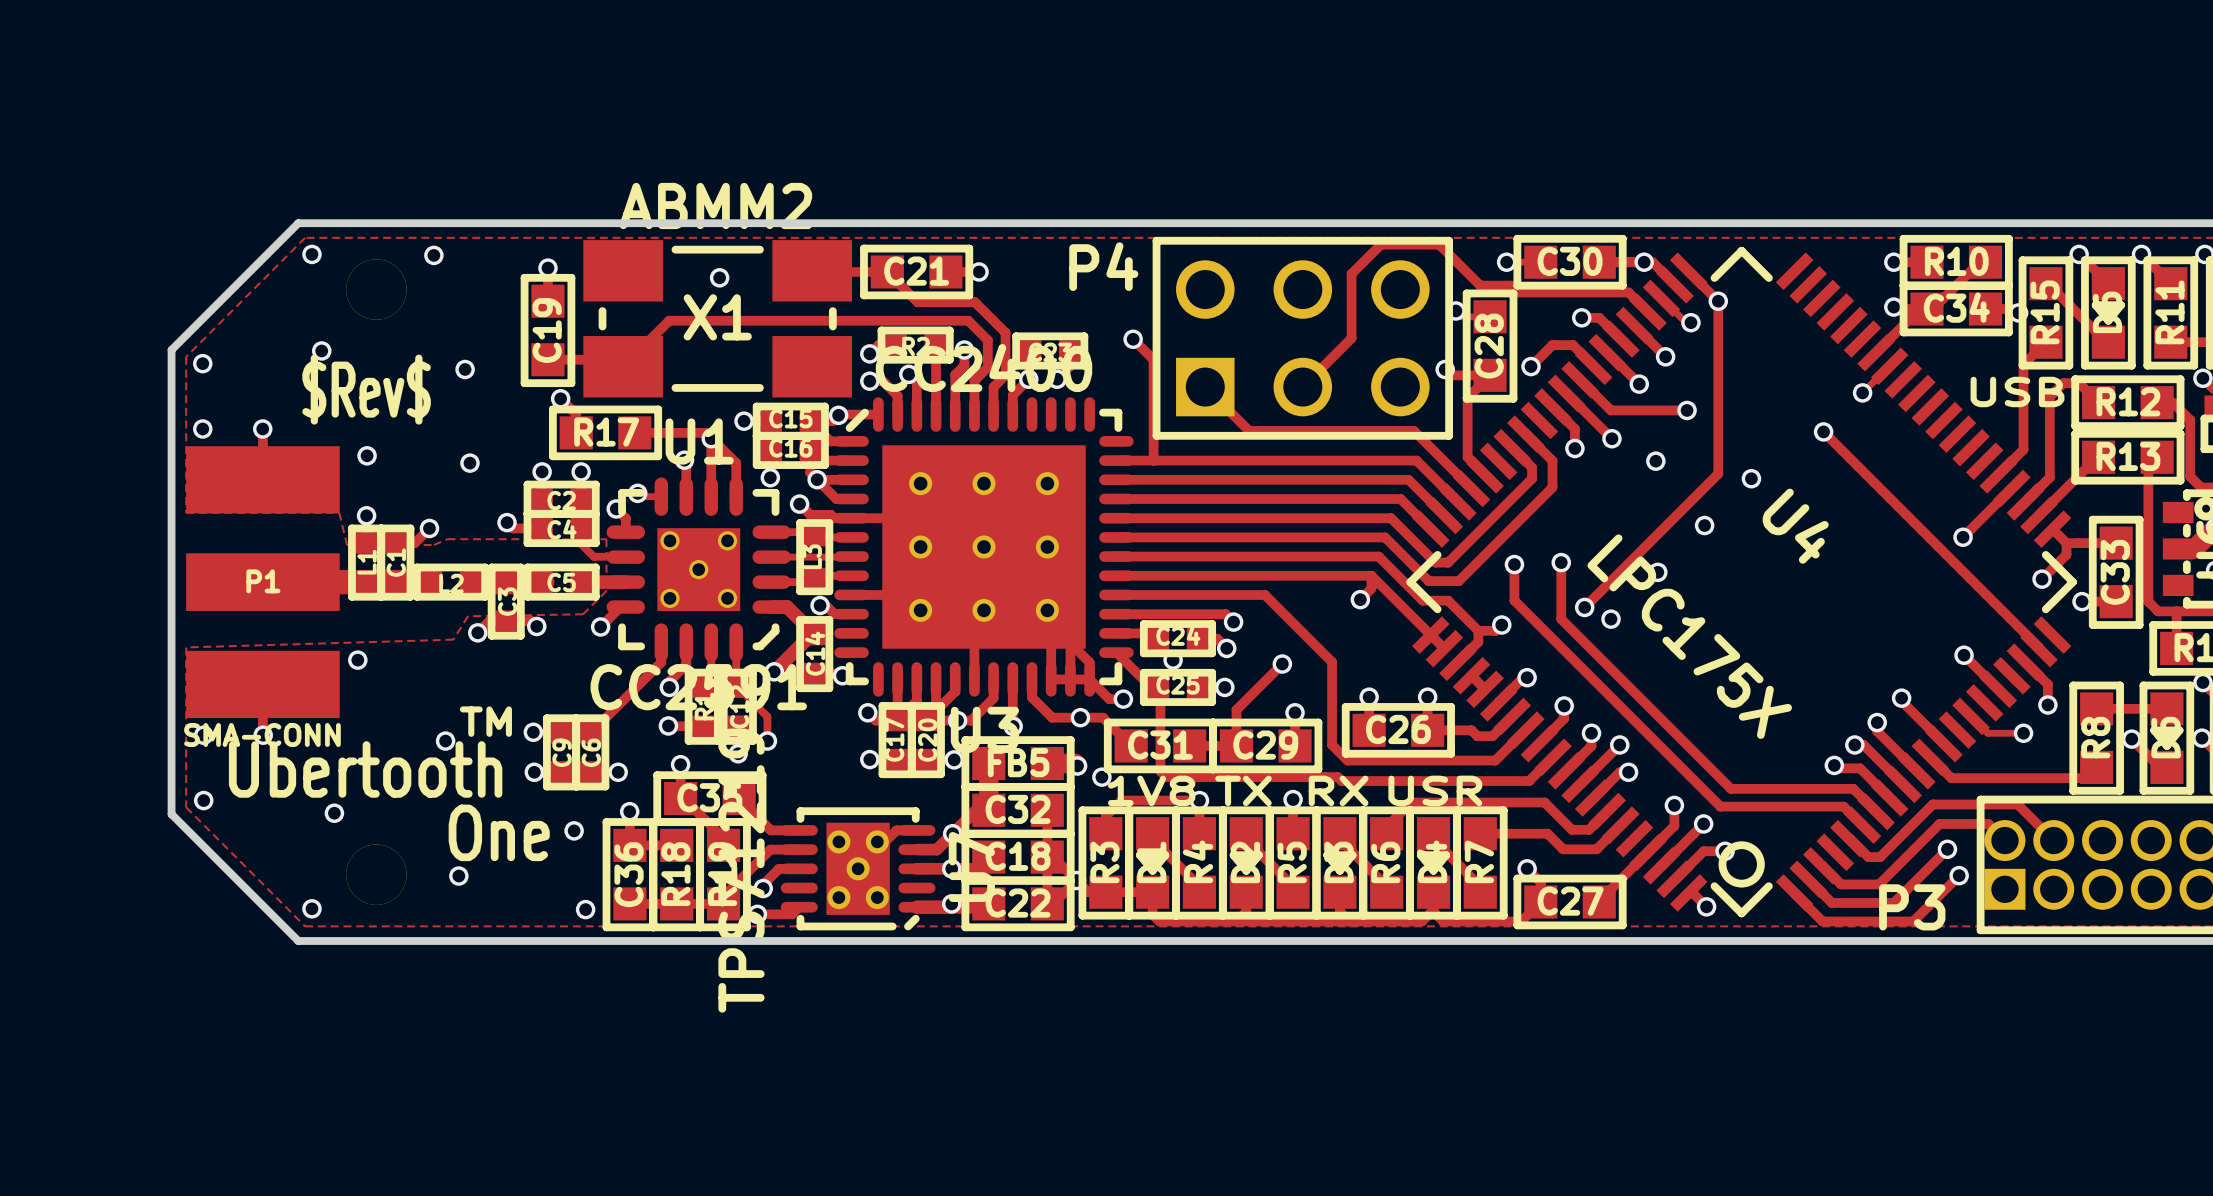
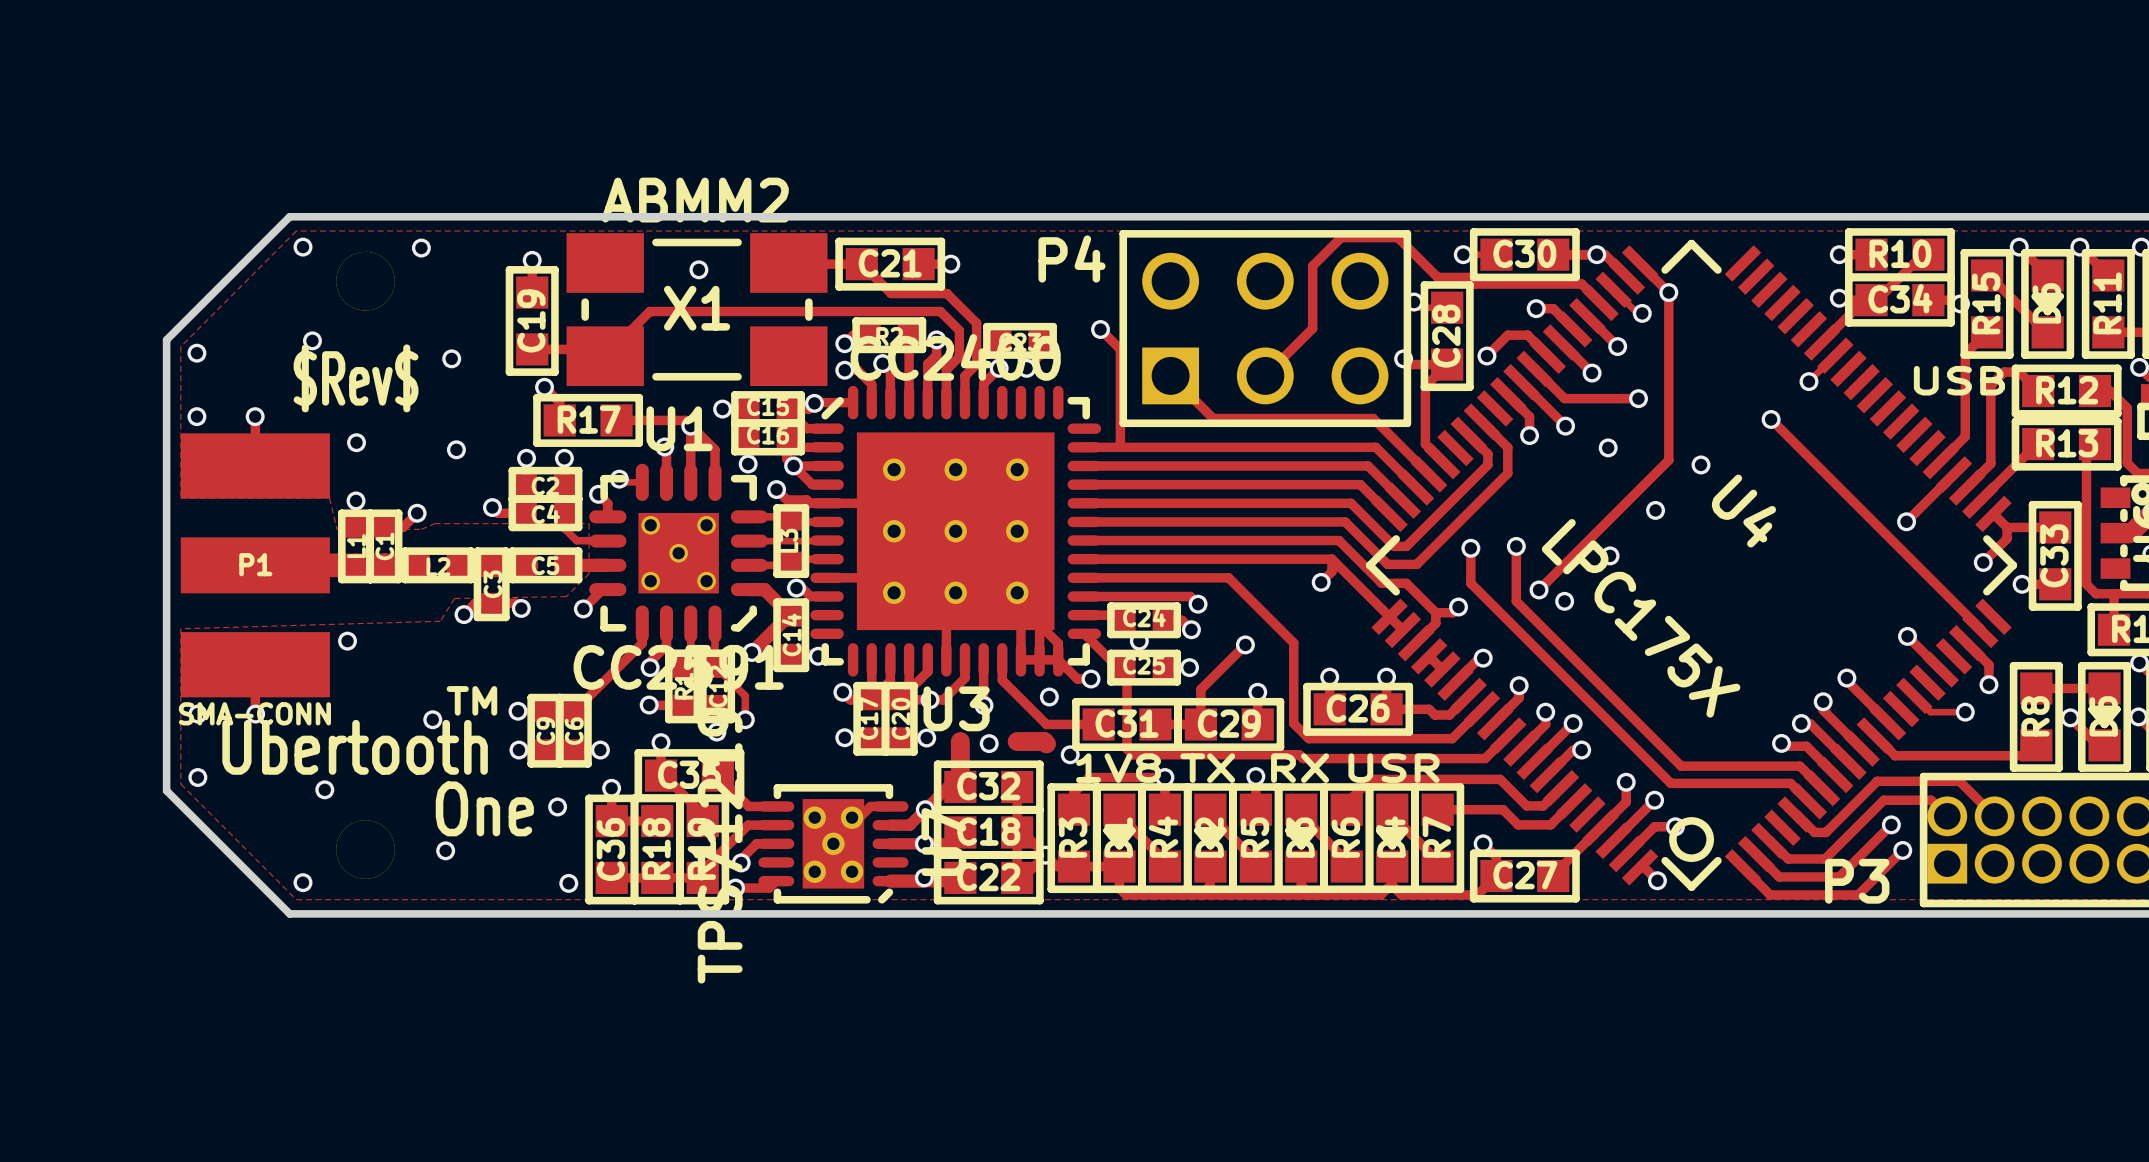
track: (1032, 697) (1052, 717) (1102, 717) (1131, 745) -> (1002, 677) (1002, 680) (1046, 724) (1098, 724)
FB5: (1018, 763) -> none
via position: (1077, 765) -> (989, 743)

